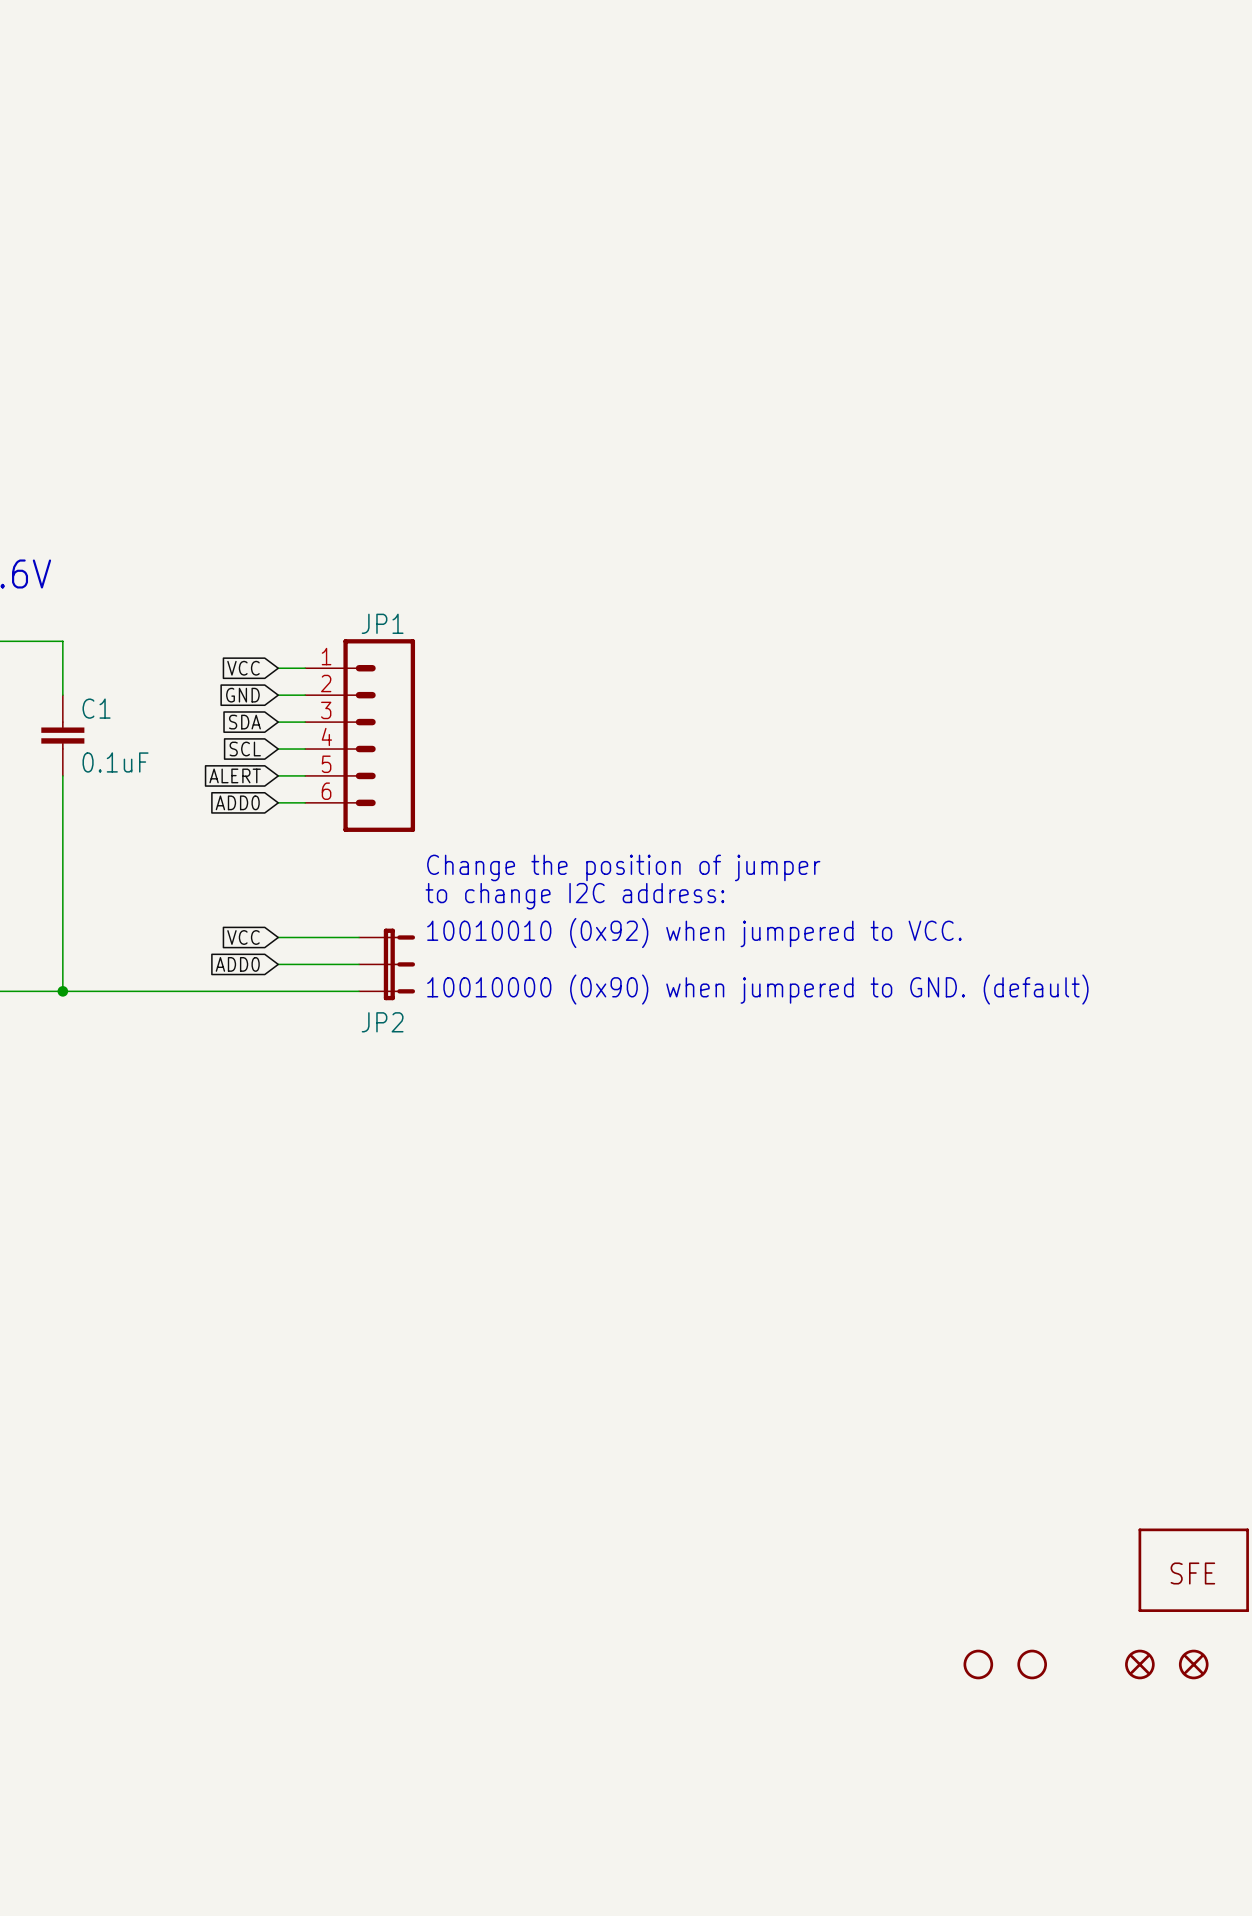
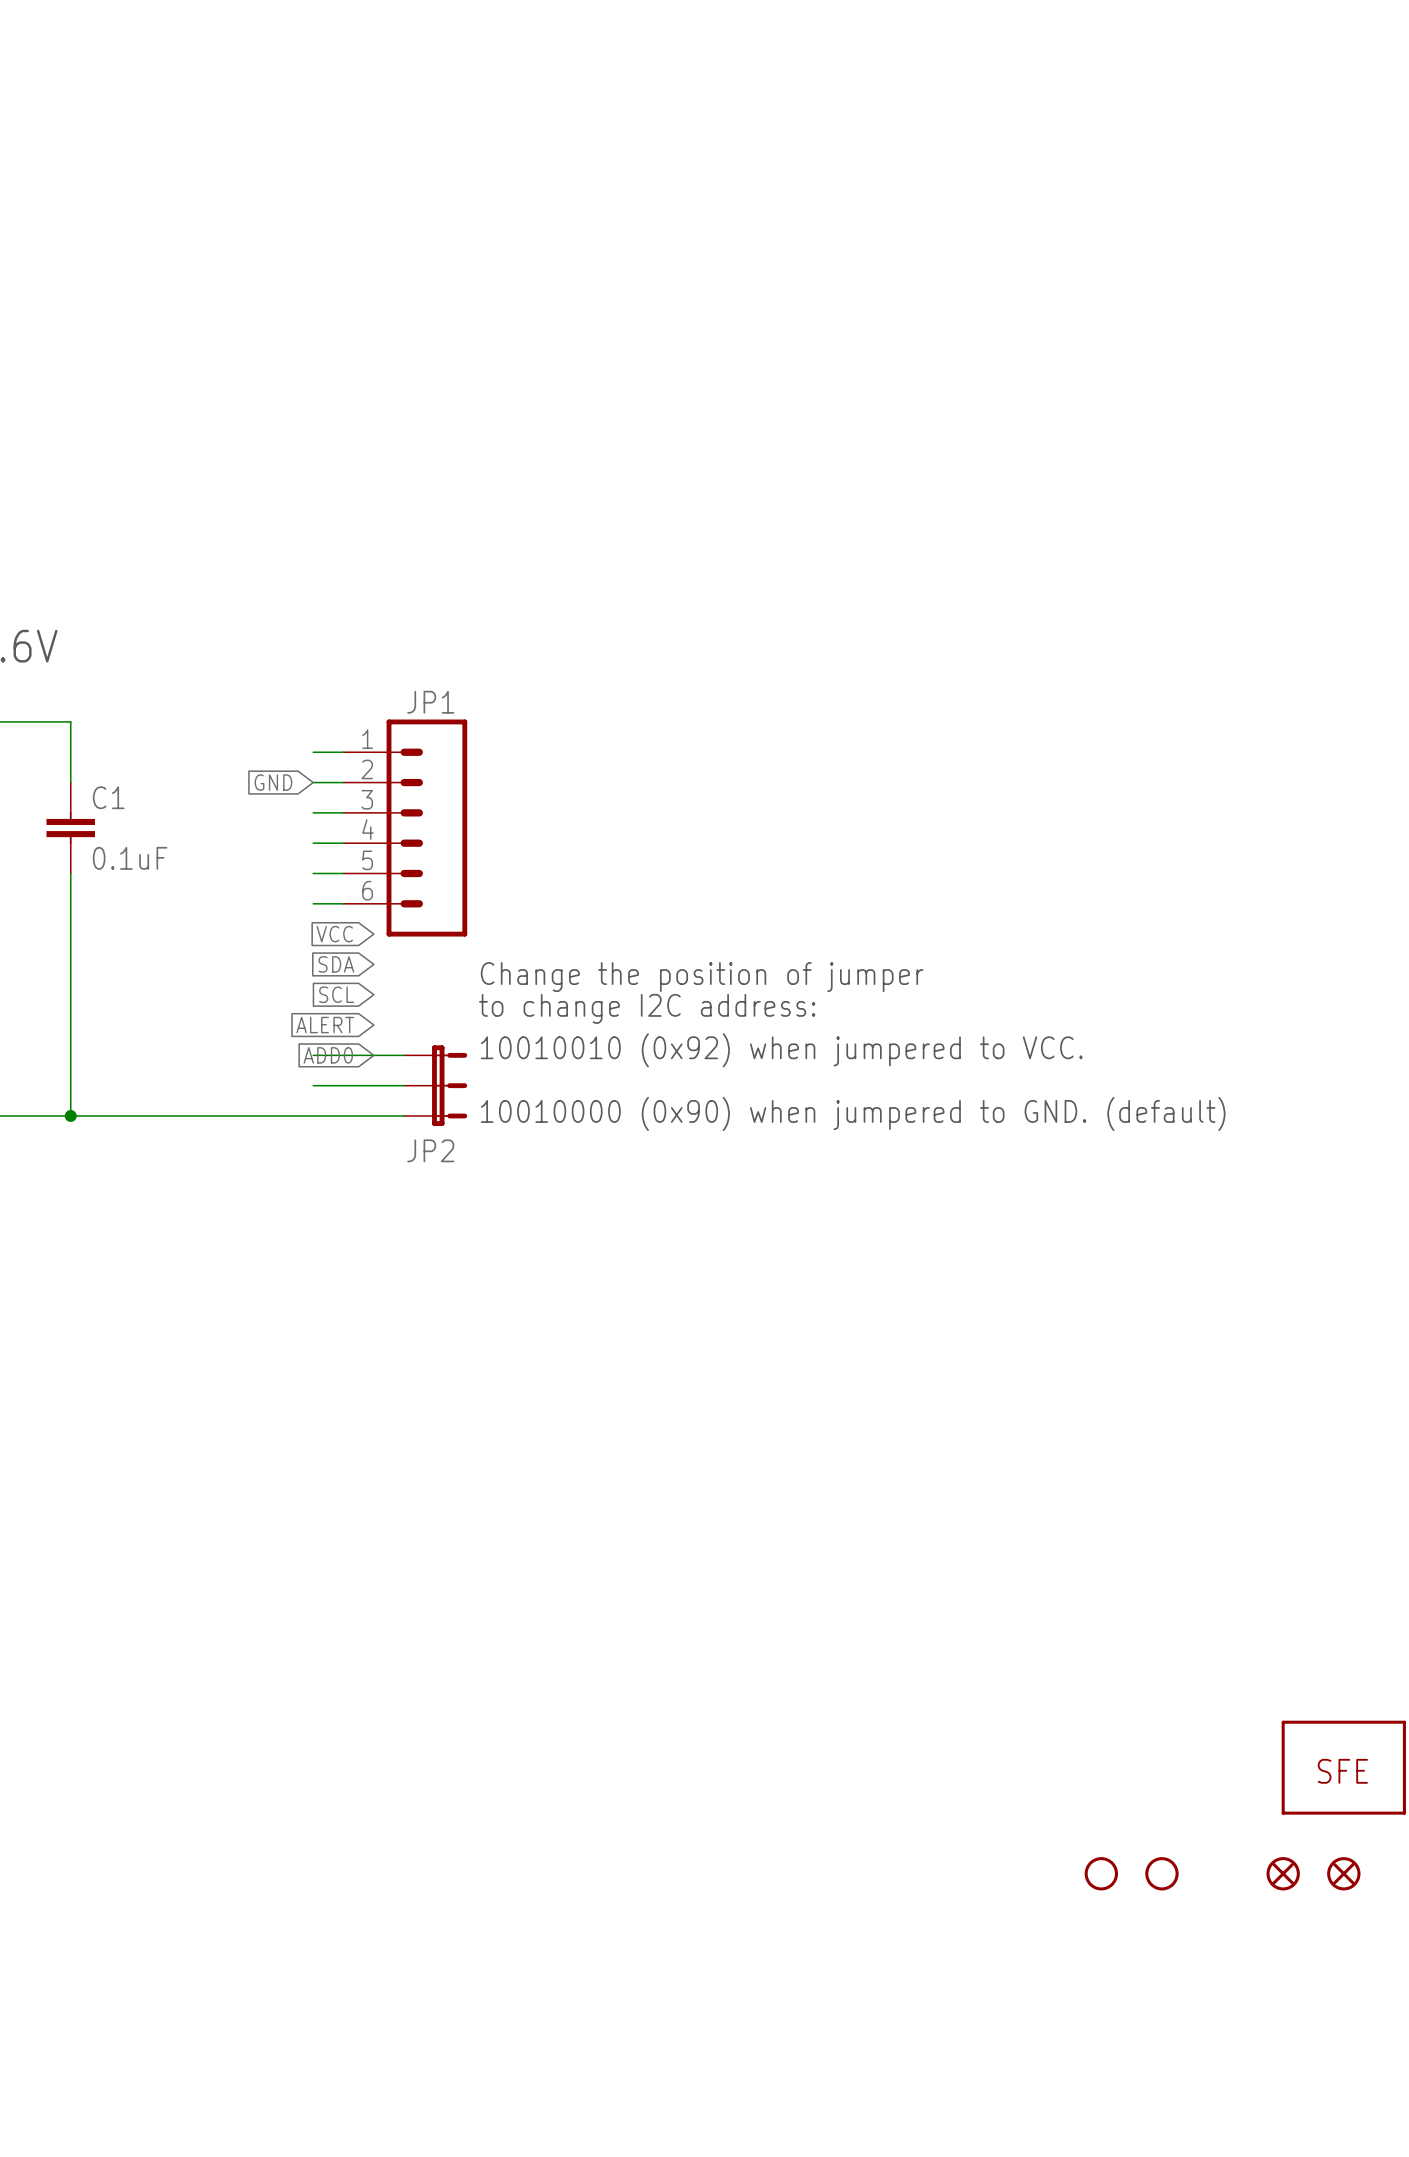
global label: VCC (243, 668) -> none
global label position: SDA (244, 722) -> SDA (336, 964)
global label position: SCL (245, 749) -> SCL (336, 994)
global label position: ALERT (235, 775) -> ALERT (325, 1025)
global label: ADD0 (237, 802) -> none
global label: none -> VCC (334, 934)
global label: VCC (243, 937) -> none
global label position: ADD0 (237, 964) -> ADD0 (328, 1055)

